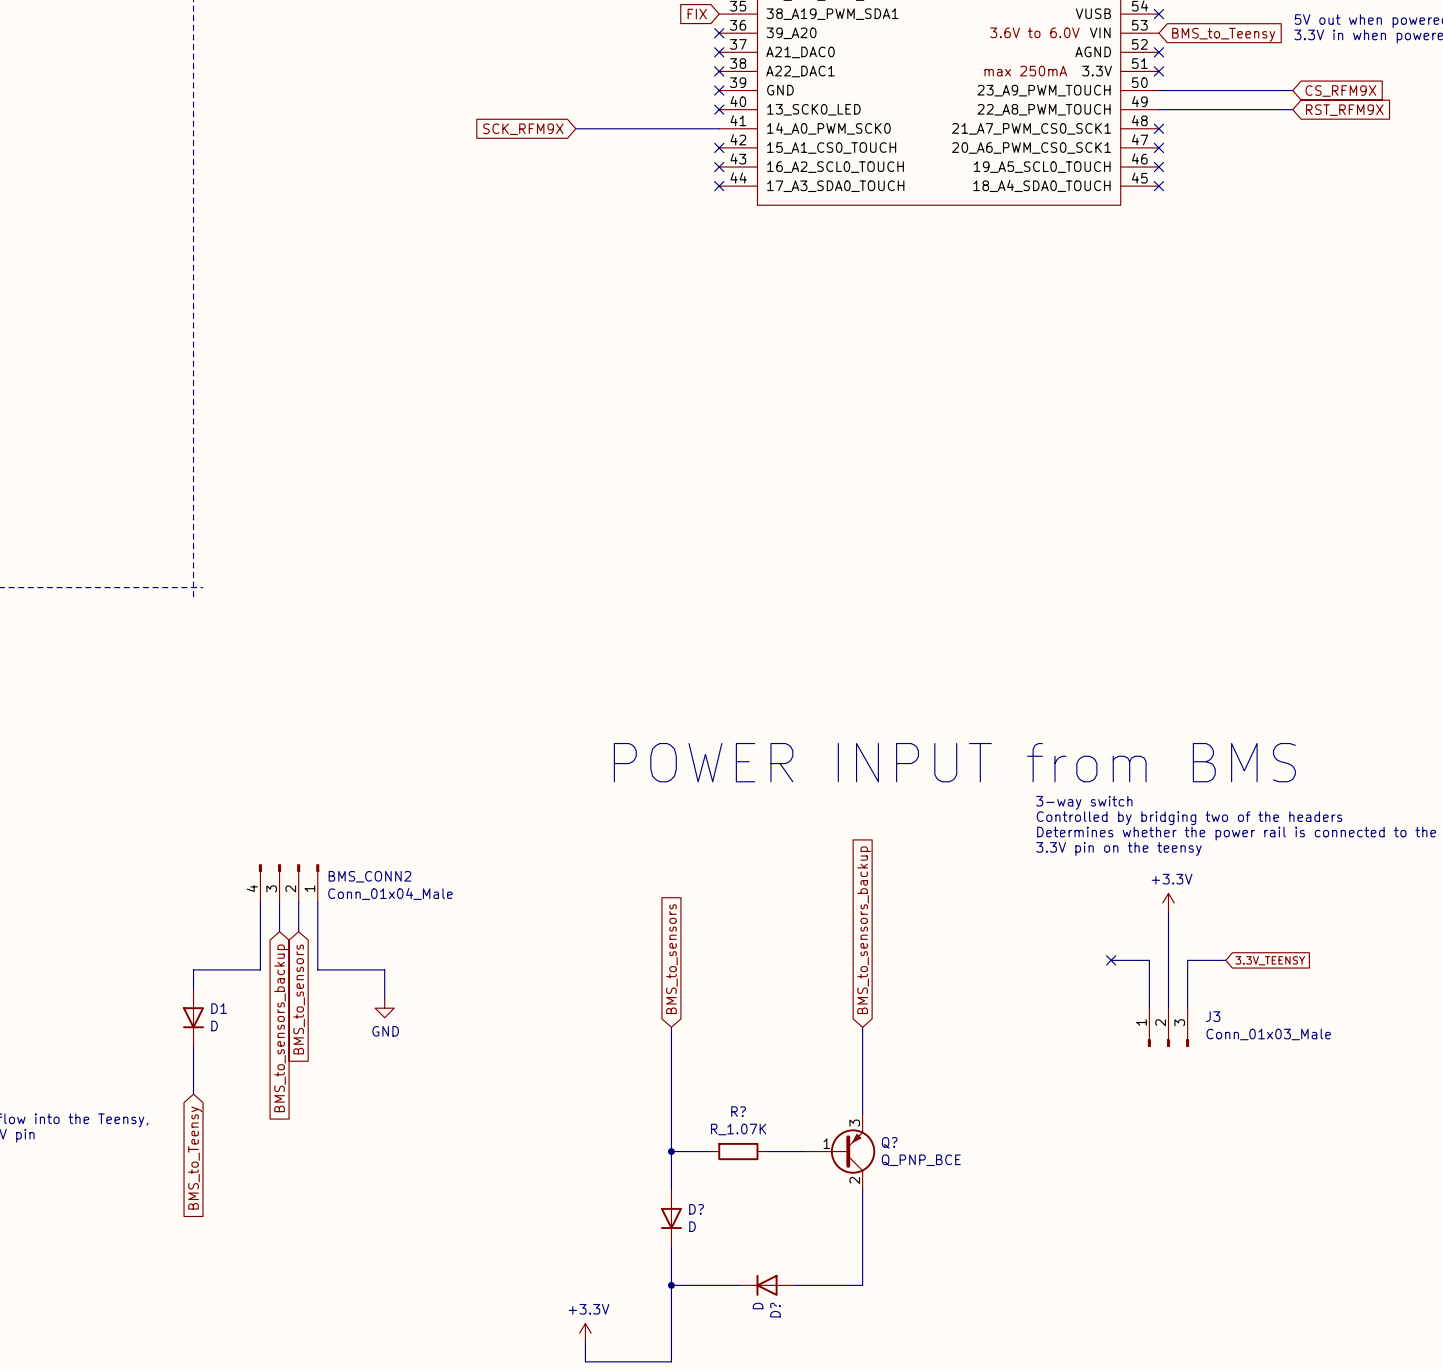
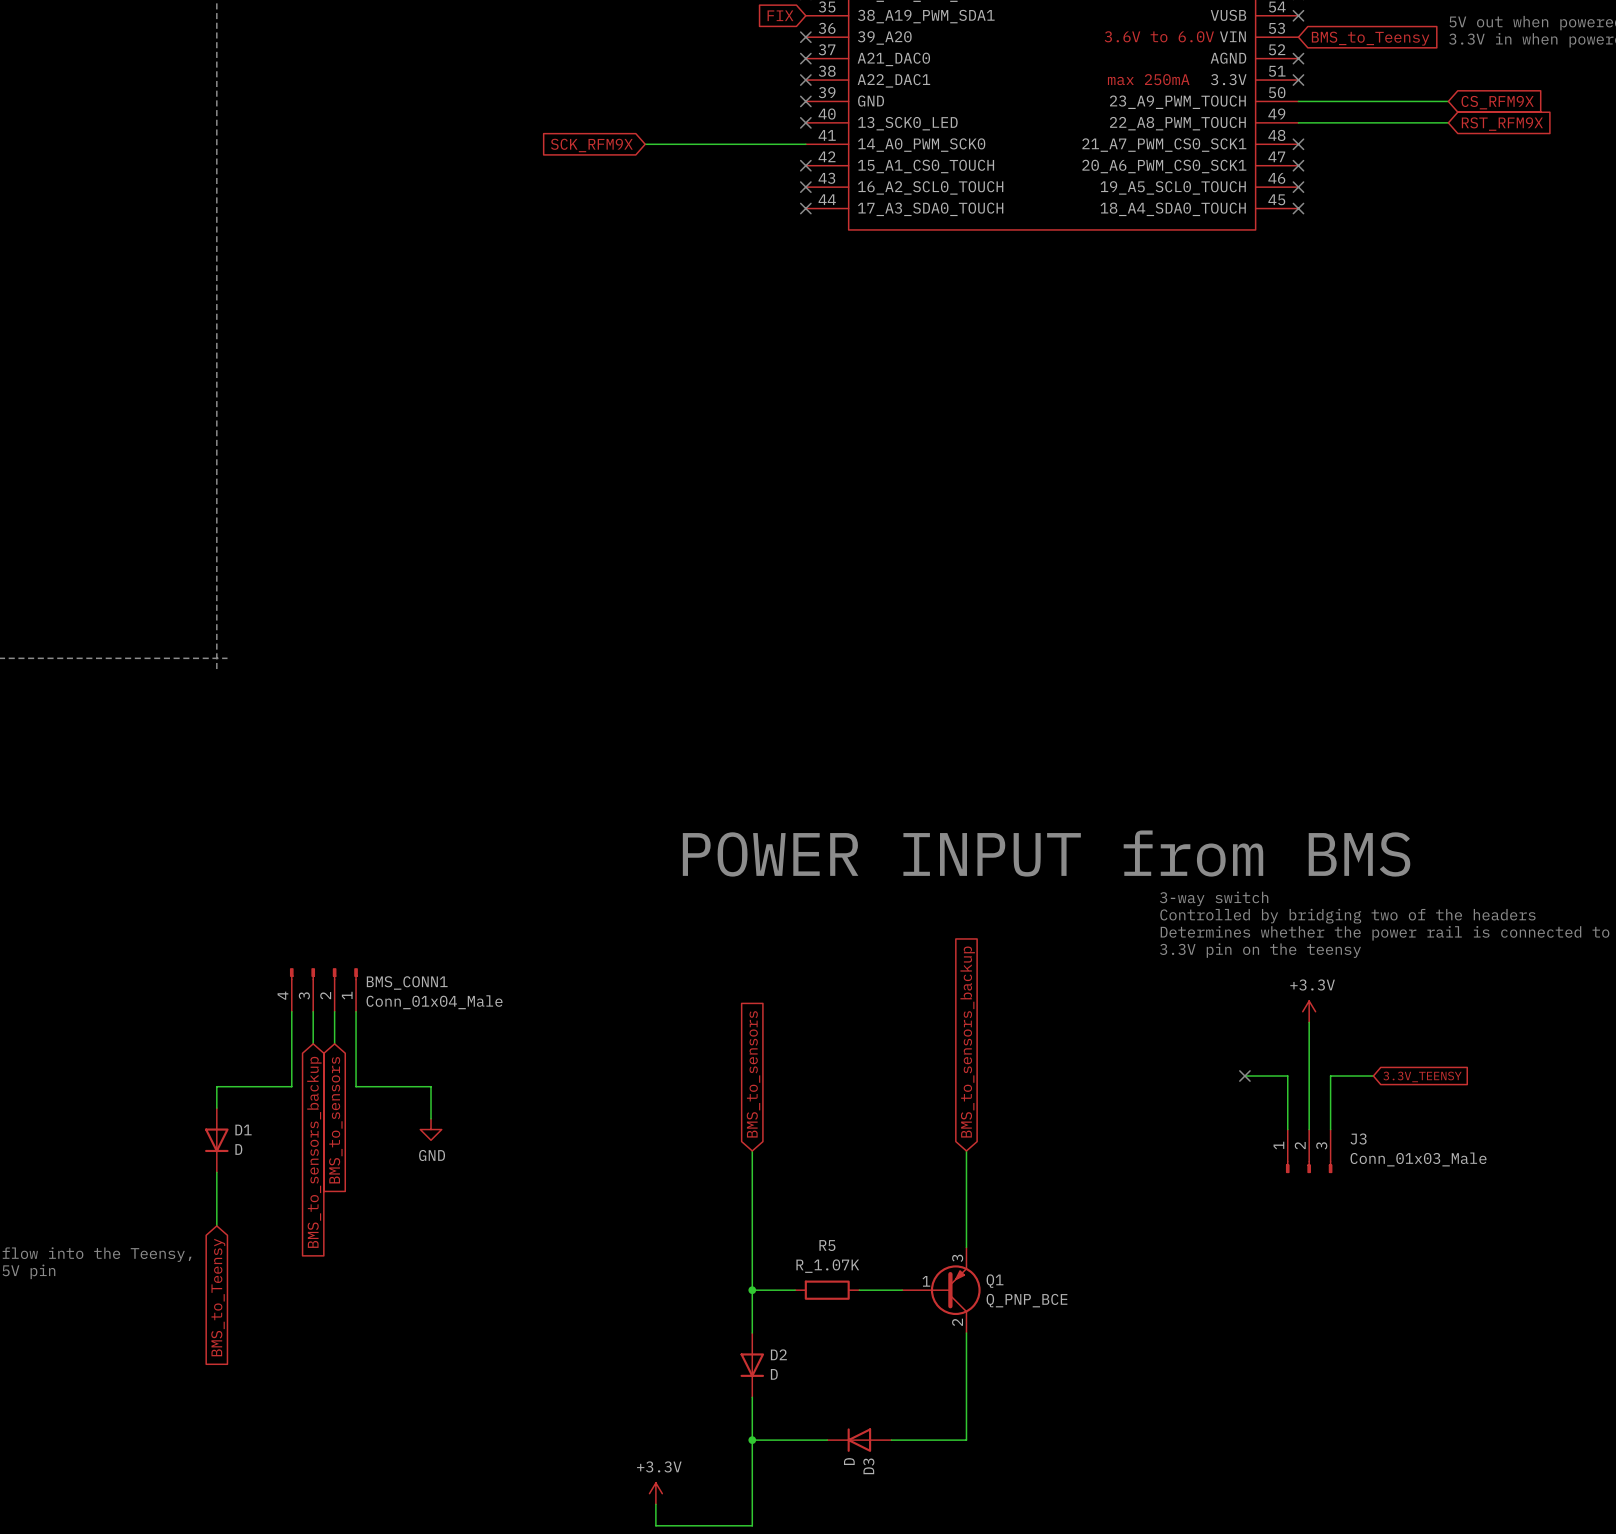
BMS_CONN2 name: BMS_CONN2 (369, 876) -> BMS_CONN1 (407, 982)
R? name: R? (738, 1111) -> R5 (827, 1245)
Q? name: Q? (889, 1142) -> Q1 (995, 1281)
D? name: D? (696, 1209) -> D2 (778, 1354)
D? name: D? (775, 1310) -> D3 (868, 1466)

